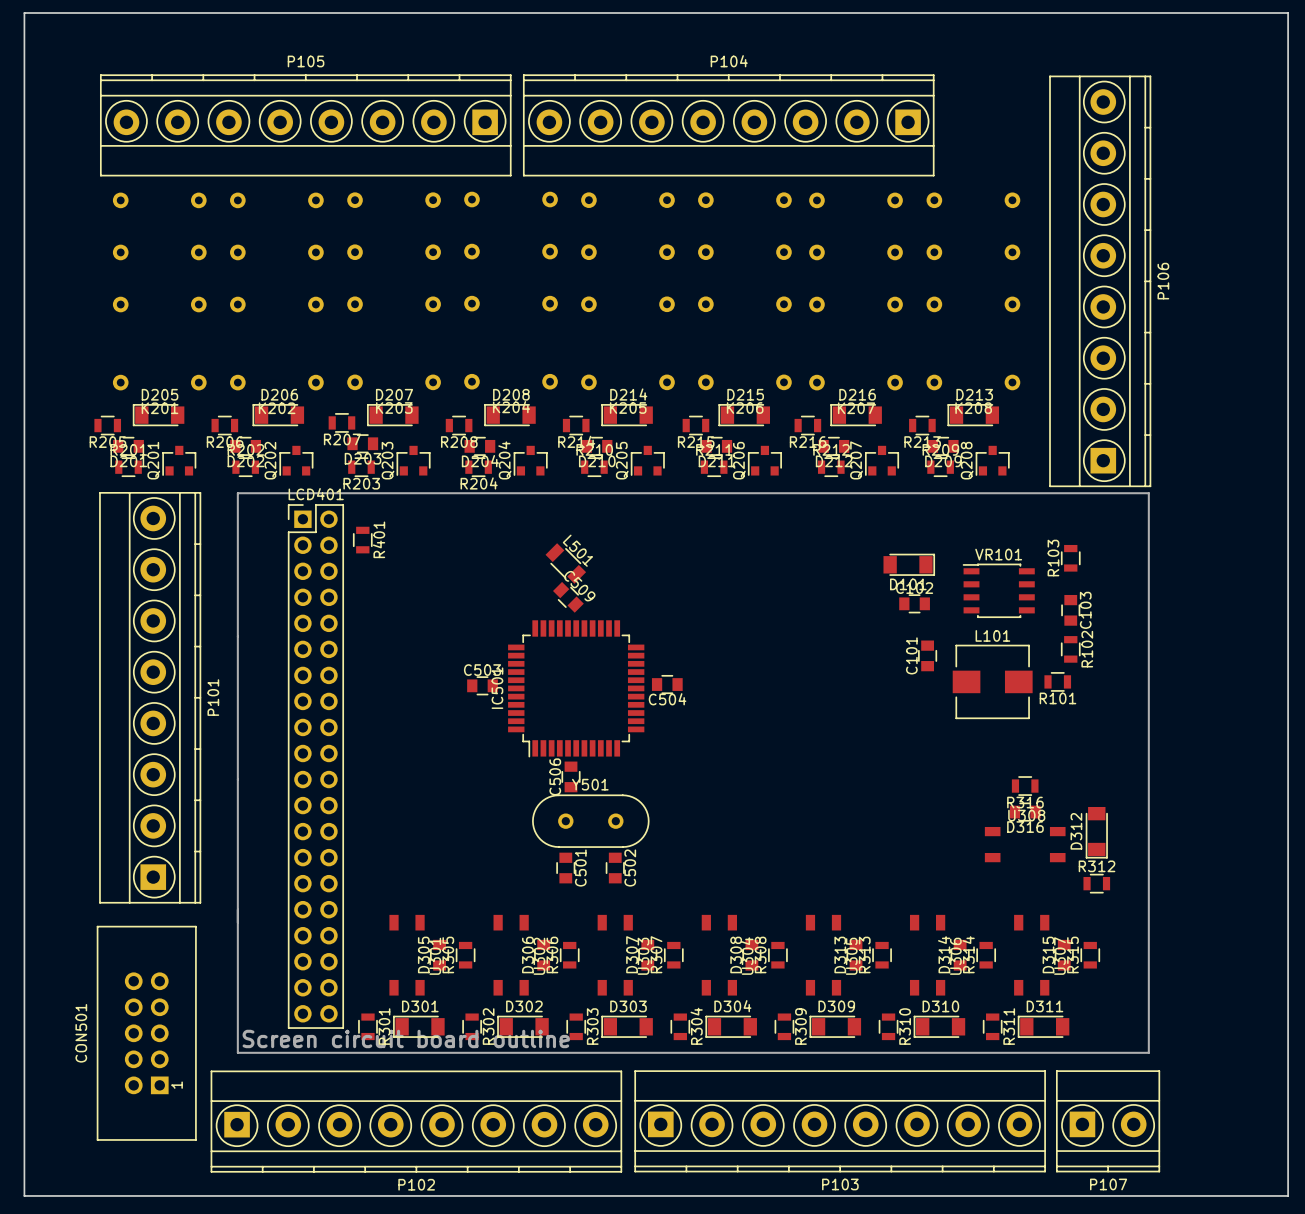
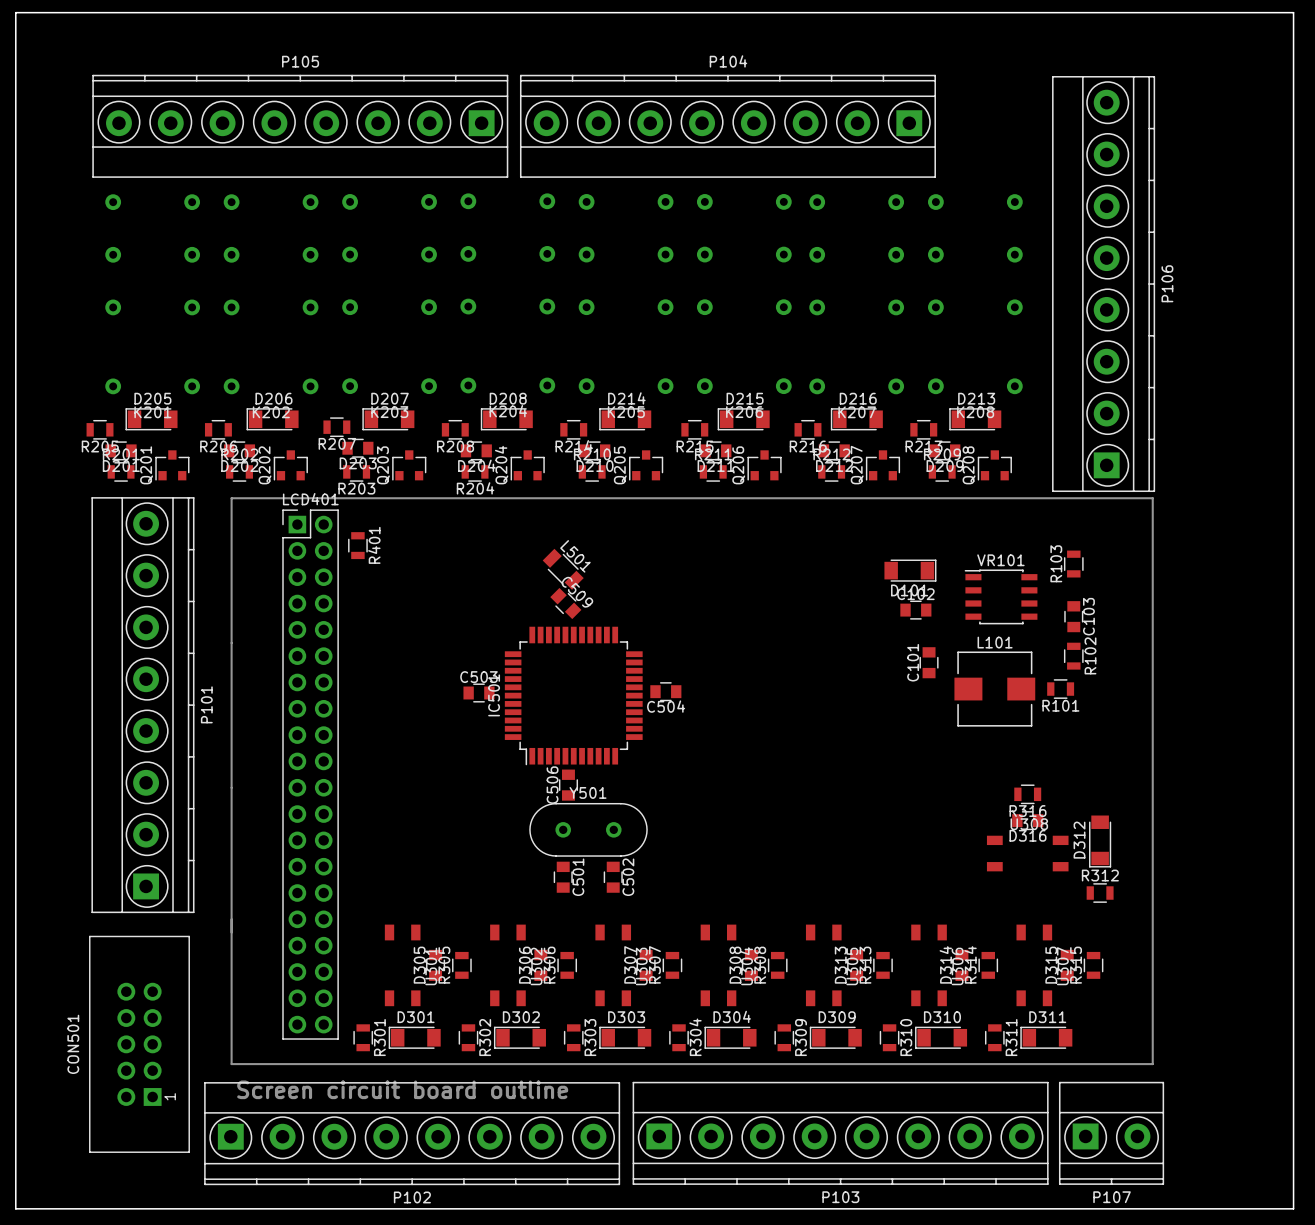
text position: Screen circuit board outline (406, 1038) -> Screen circuit board outline (402, 1089)

